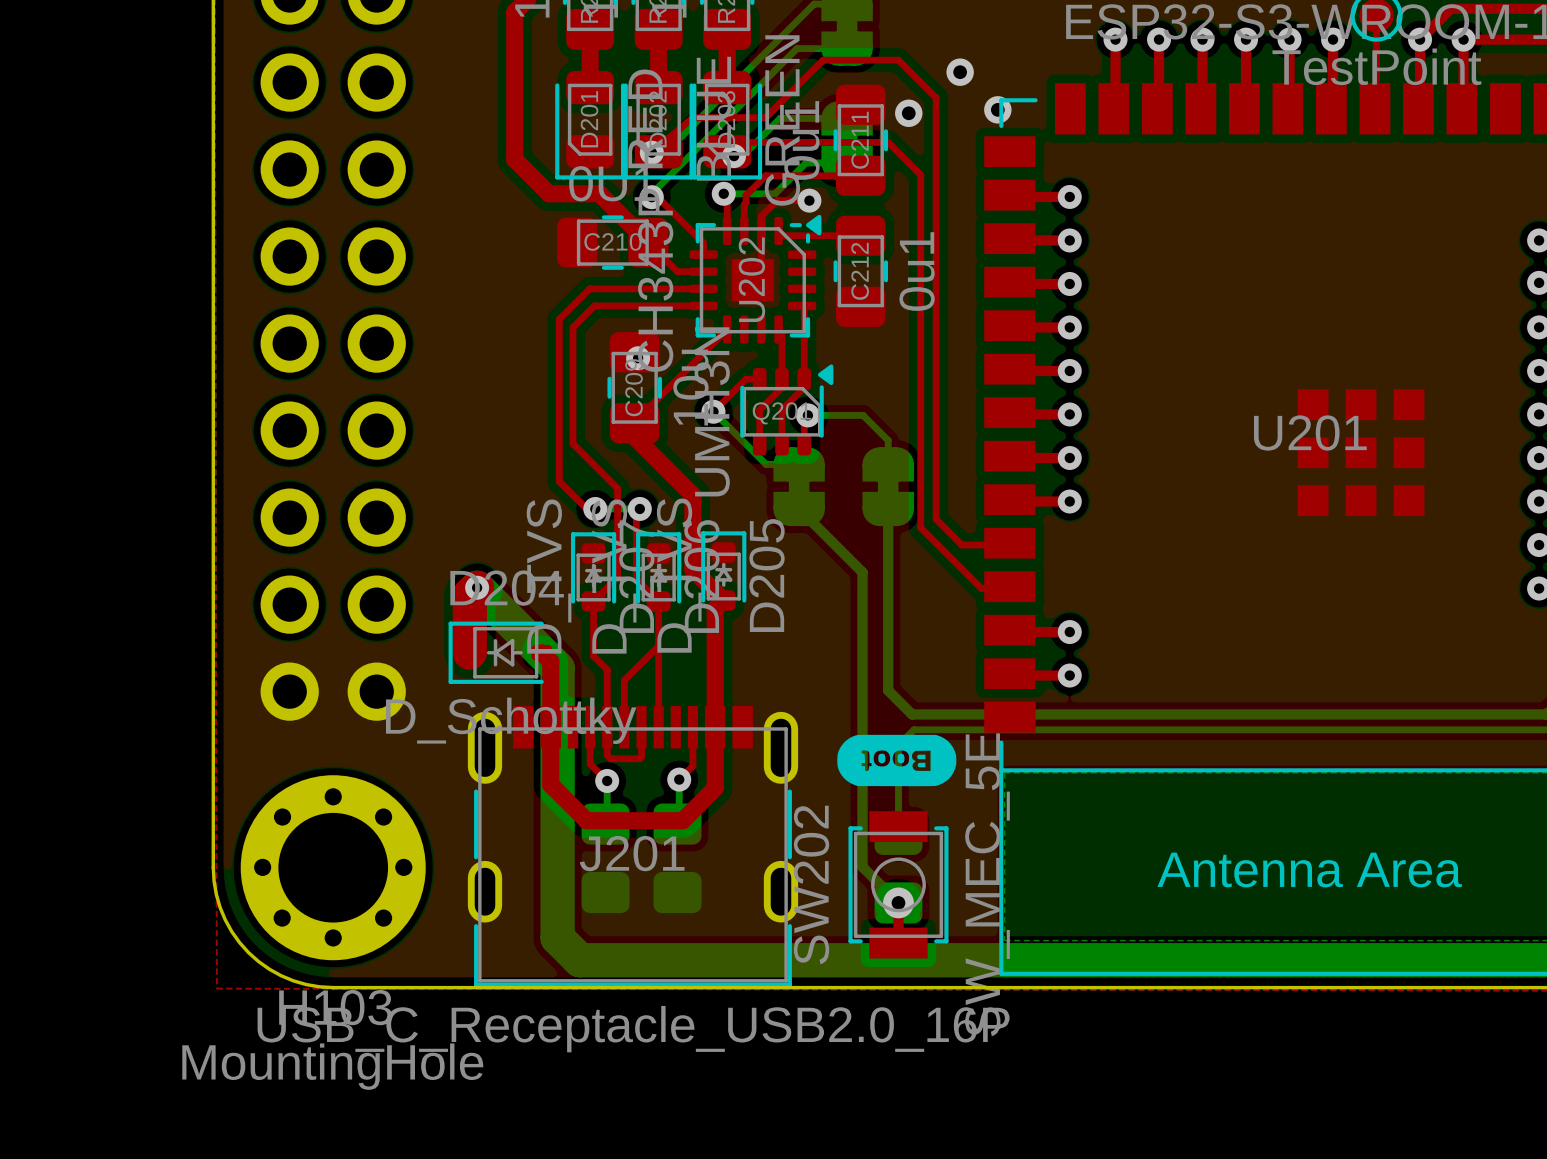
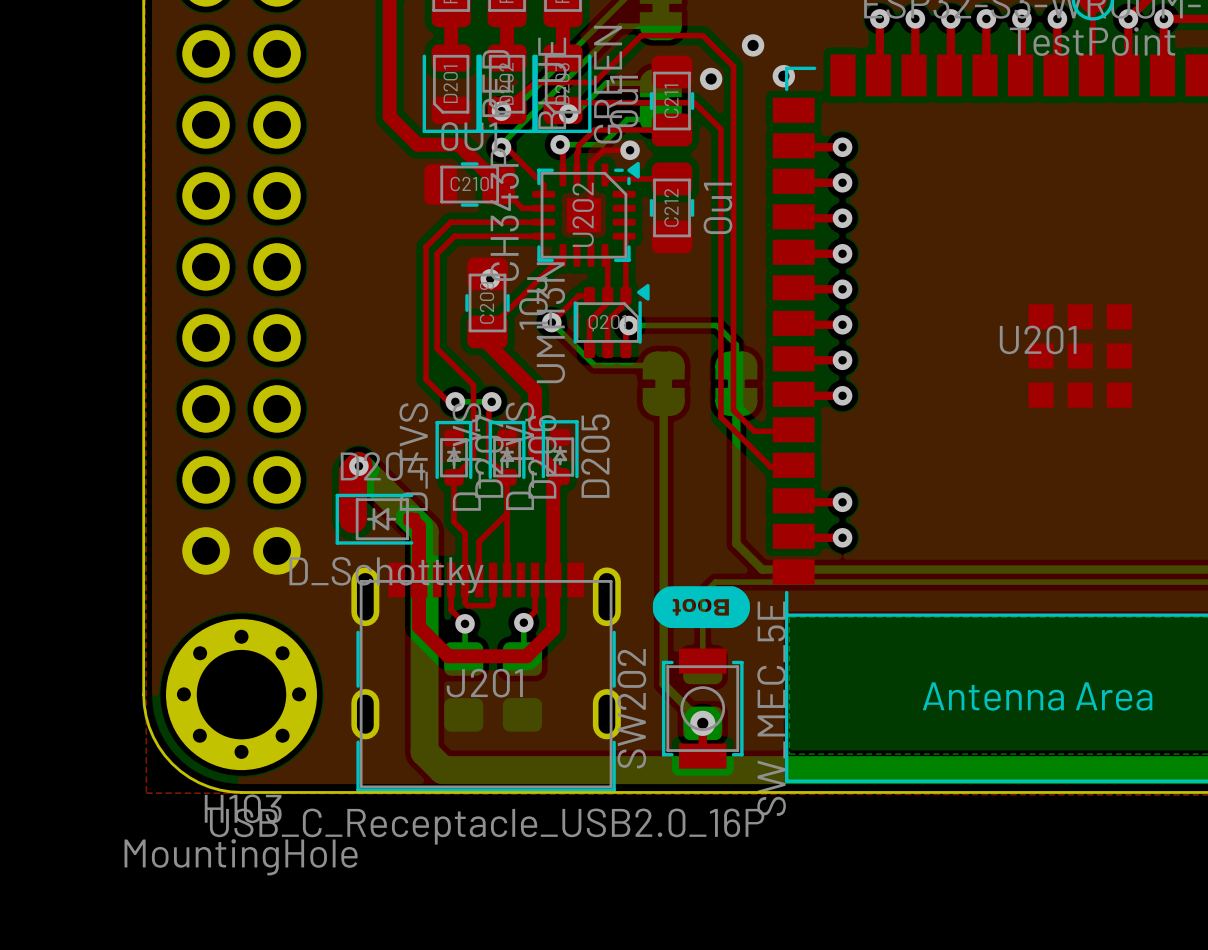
bottom track: (863, 415) (888, 440) (888, 464) -> (673, 325) (716, 325) (736, 345) (736, 365)
bottom track: none -> (621, 365) (663, 365)
part: (799, 486) -> none
part: none -> (663, 383)
part: (888, 486) -> none
part: none -> (736, 383)
bottom track: (799, 508) (862, 572) (862, 866) -> (663, 401) (663, 684) (673, 694)
bottom track: (888, 508) (888, 690) (912, 714) (971, 714) -> (736, 401) (736, 543) (762, 569)

